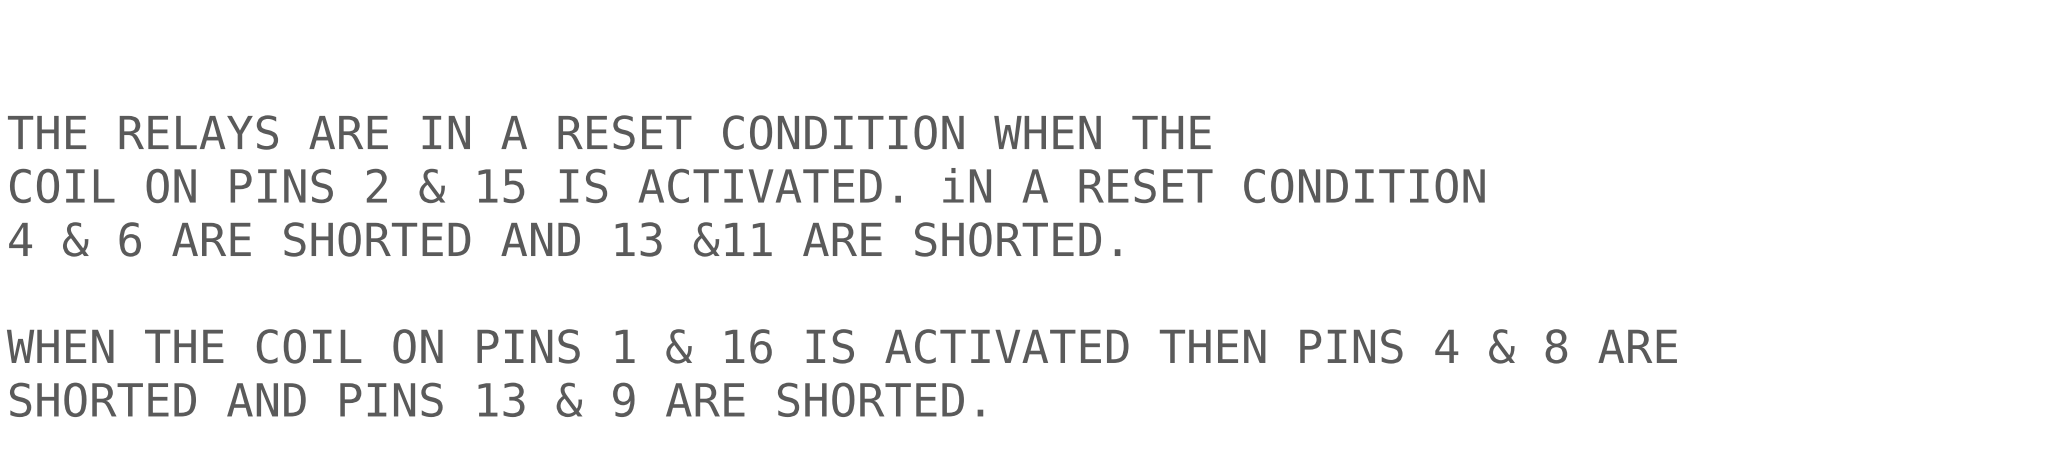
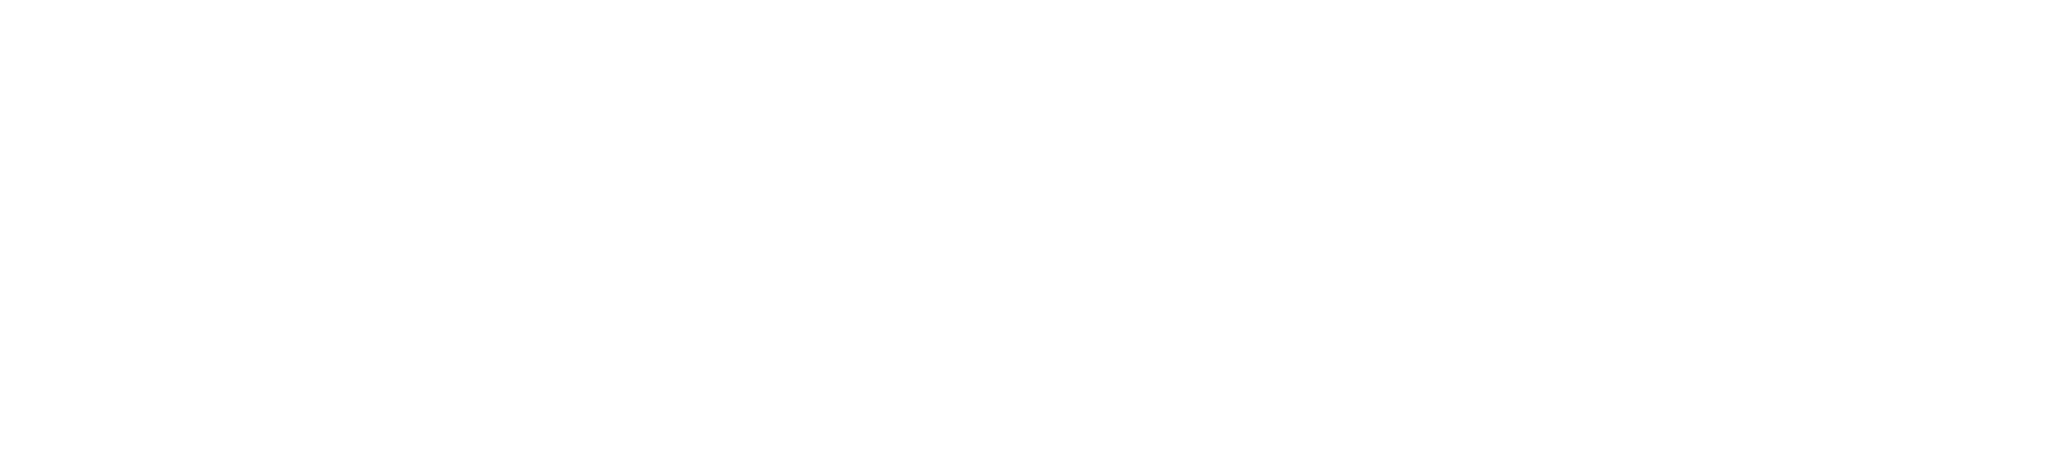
text: THE RELAYS ARE IN A RESET CONDITION WHEN THE (609, 132) -> none
text: COIL ON PINS 2 & 15 IS ACTIVATED. iN A RESET CONDITION (747, 185) -> none
text: 4 & 6 ARE SHORTED AND 13 &11 ARE SHORTED. (564, 239) -> none
text: WHEN THE COIL ON PINS 1 & 16 IS ACTIVATED THEN PINS 4 & 8 ARE (841, 346) -> none
text: SHORTED AND PINS 13 & 9 ARE SHORTED. (496, 399) -> none

